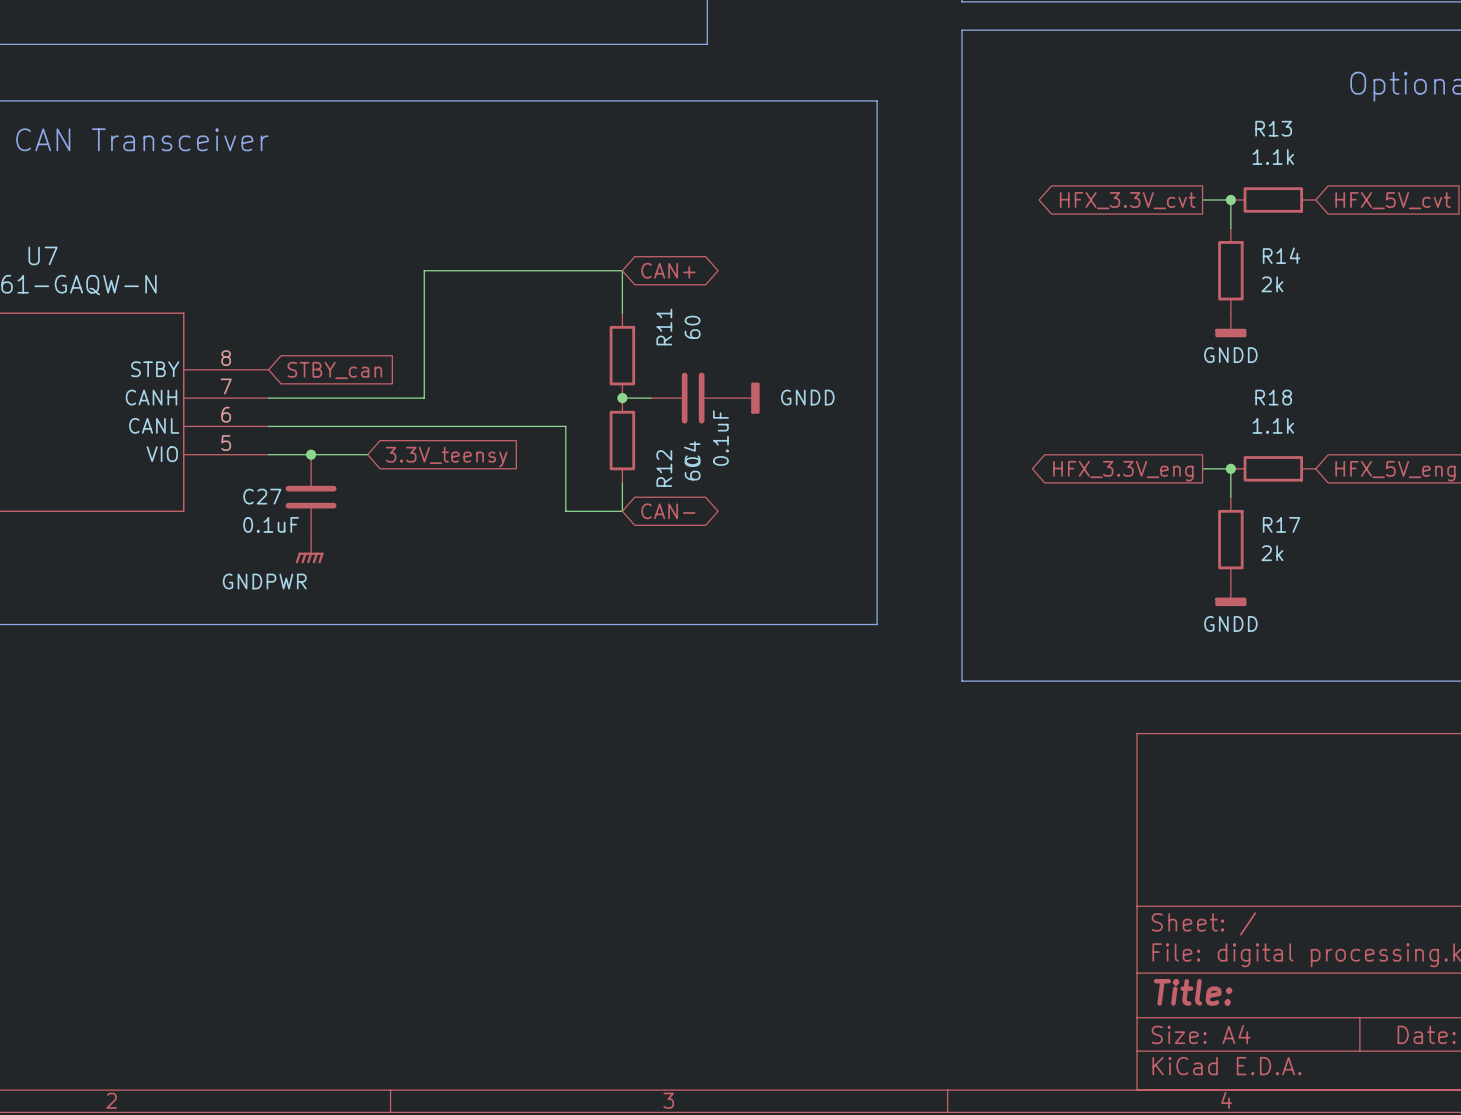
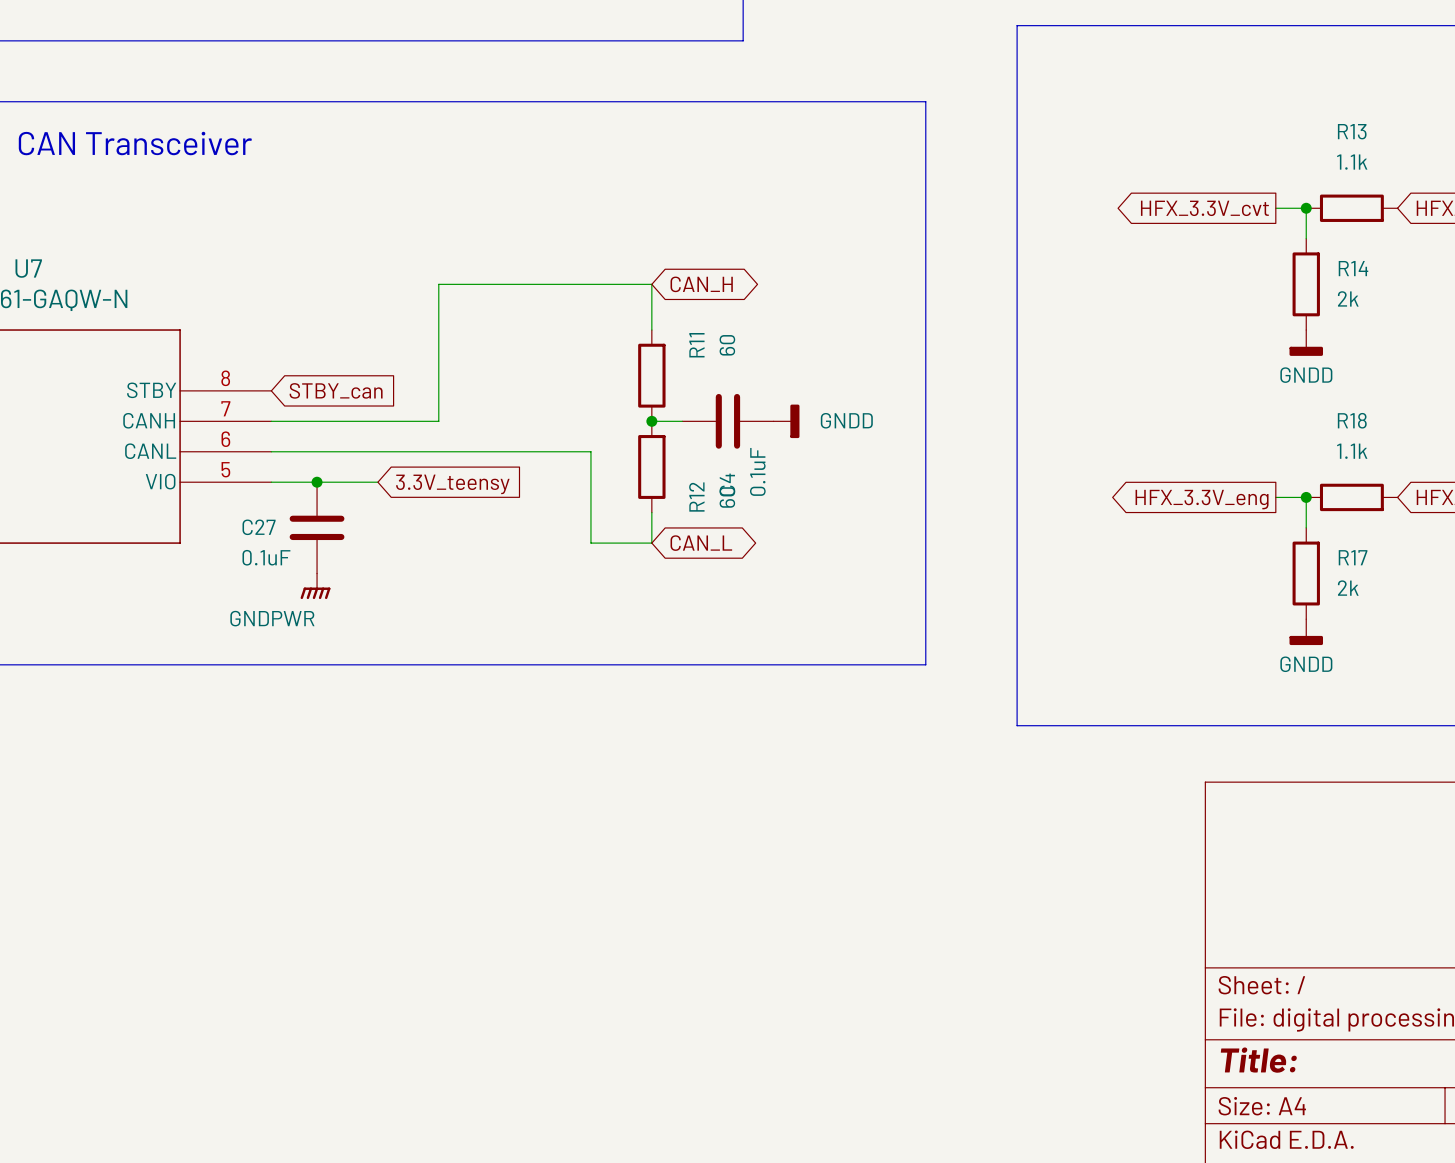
global label: CAN+ (668, 270) -> CAN_H (701, 284)
global label: CAN- (668, 511) -> CAN_L (701, 543)

